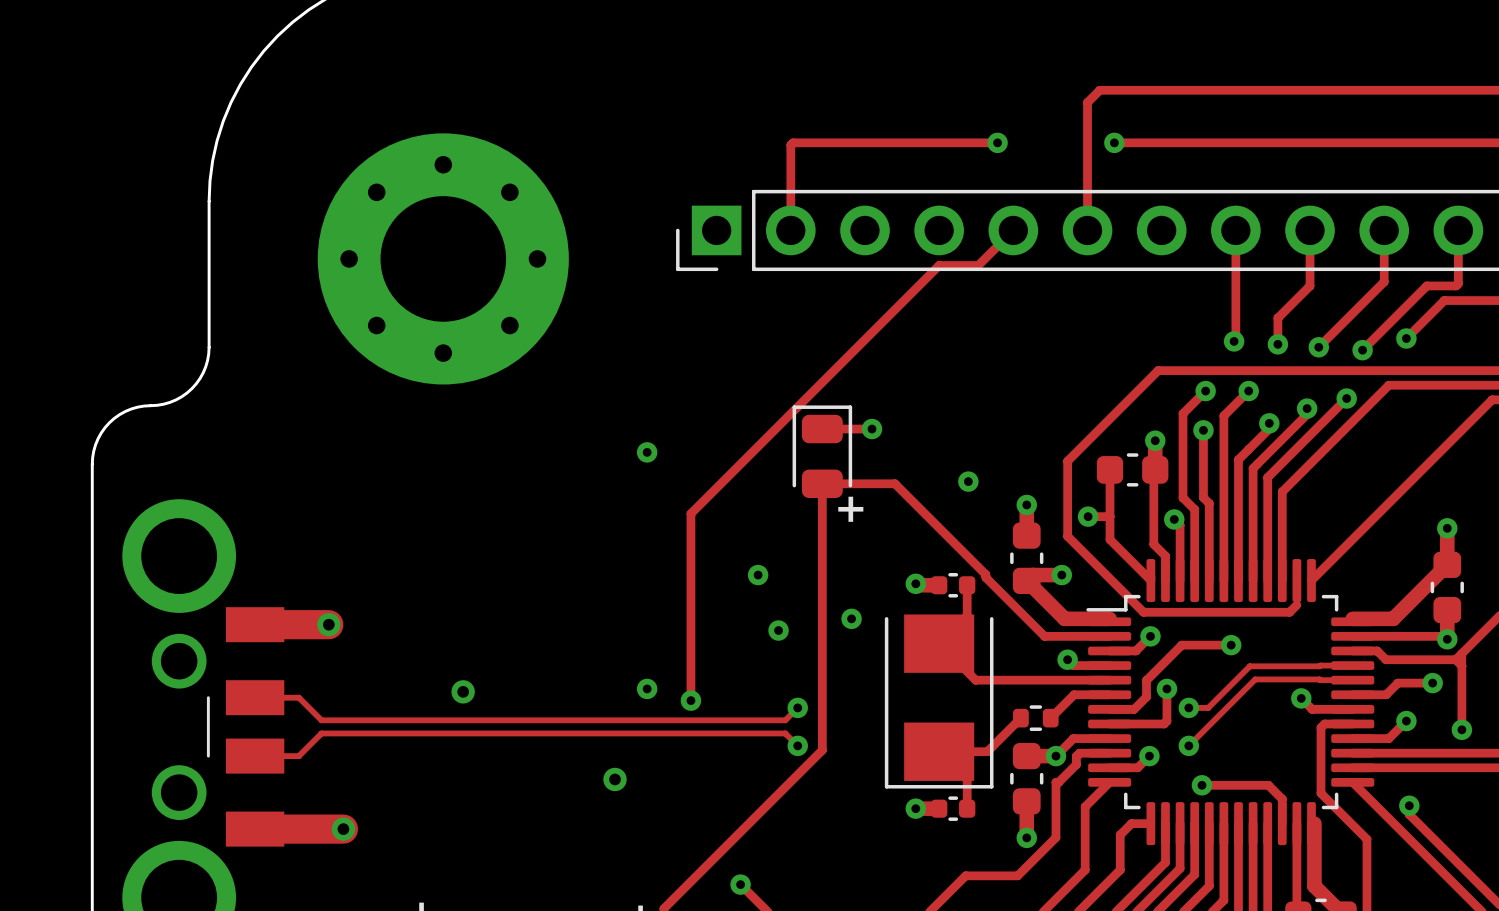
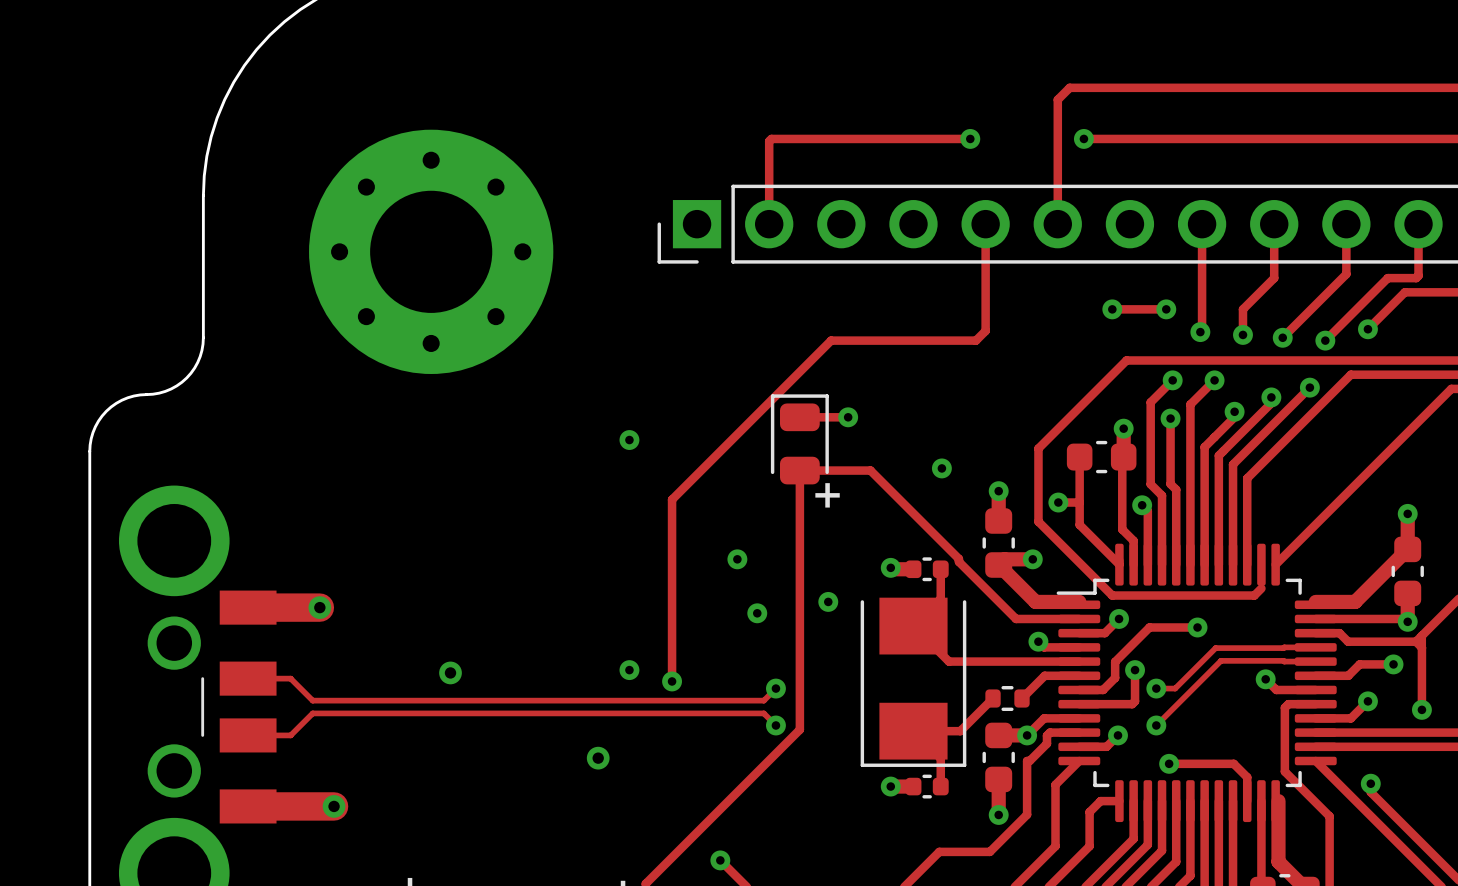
track: (1013, 230) (978, 265) (939, 265) (854, 350) -> (985, 224) (985, 330) (975, 340) (831, 340)
track: none -> (1112, 309) (1166, 309)
via: none -> (1112, 309)
via: none -> (1166, 309)

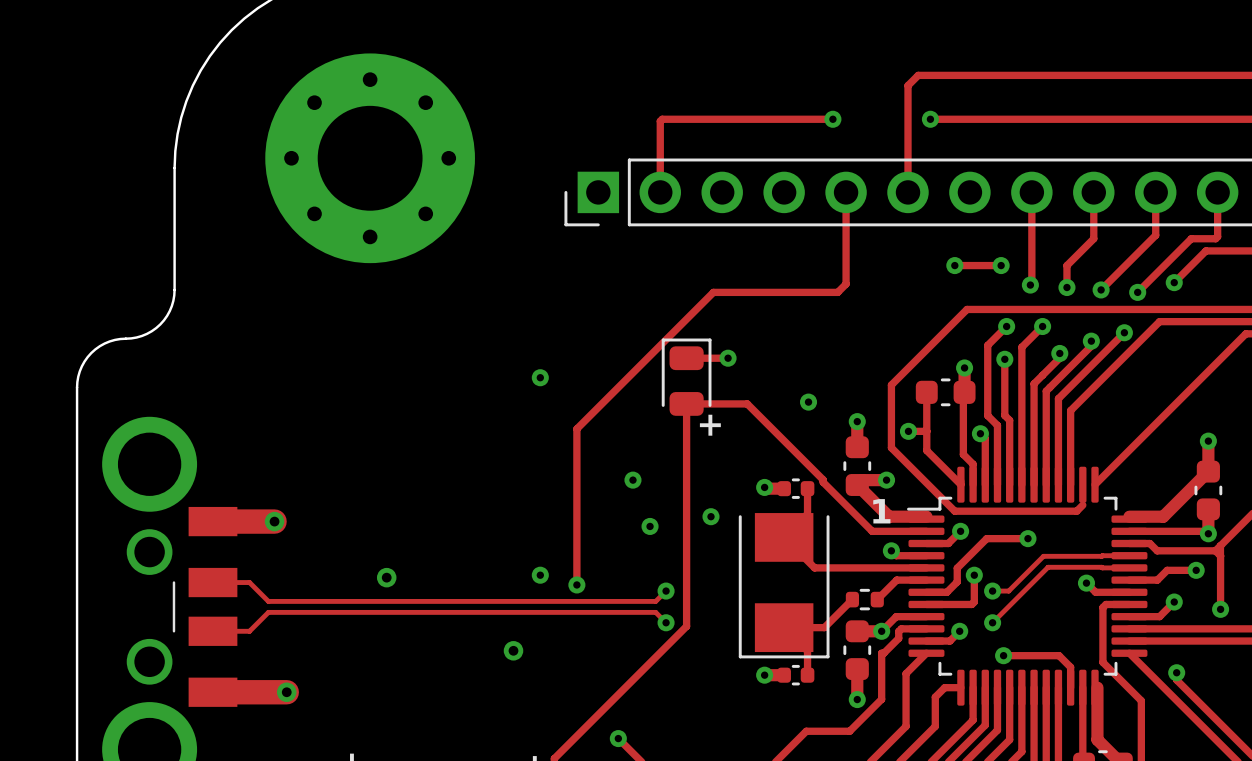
part position: (431, 251) -> (370, 158)
text: none -> 1 (881, 511)

